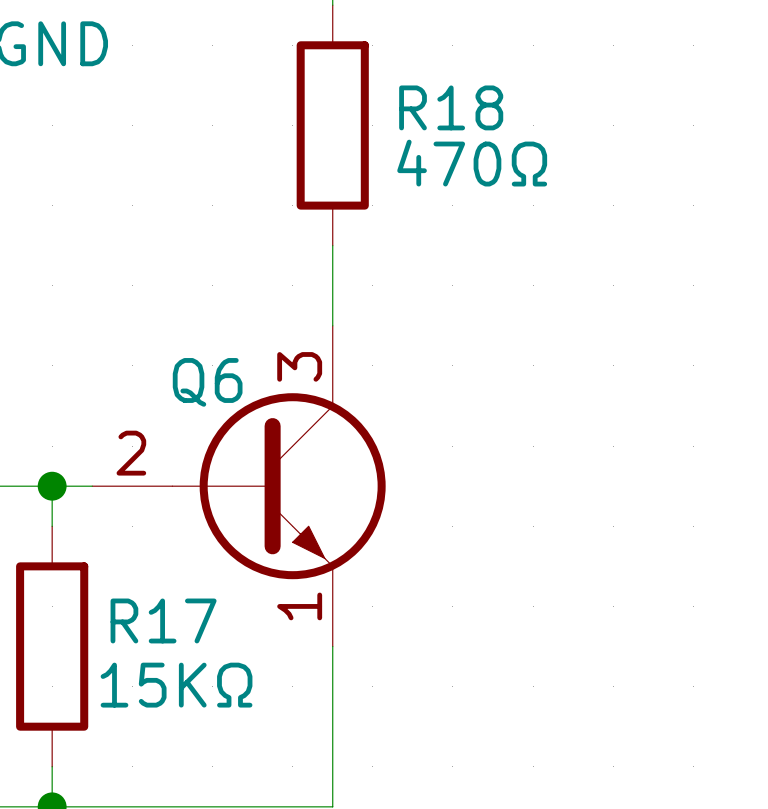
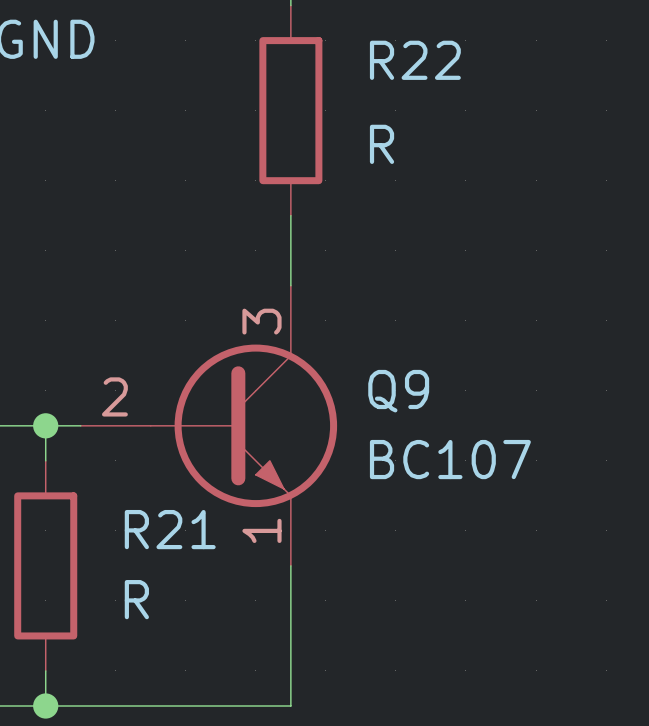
R18 name: R18 (451, 107) -> R22 (415, 60)
R18 value: 470Ω (472, 163) -> R (382, 144)
Q6 name: Q6 (207, 382) -> Q9 (398, 391)
Q6 value: none -> BC107 (450, 459)
R17 name: R17 (163, 620) -> R21 (170, 529)
R17 value: 15KΩ (176, 685) -> R (136, 599)

